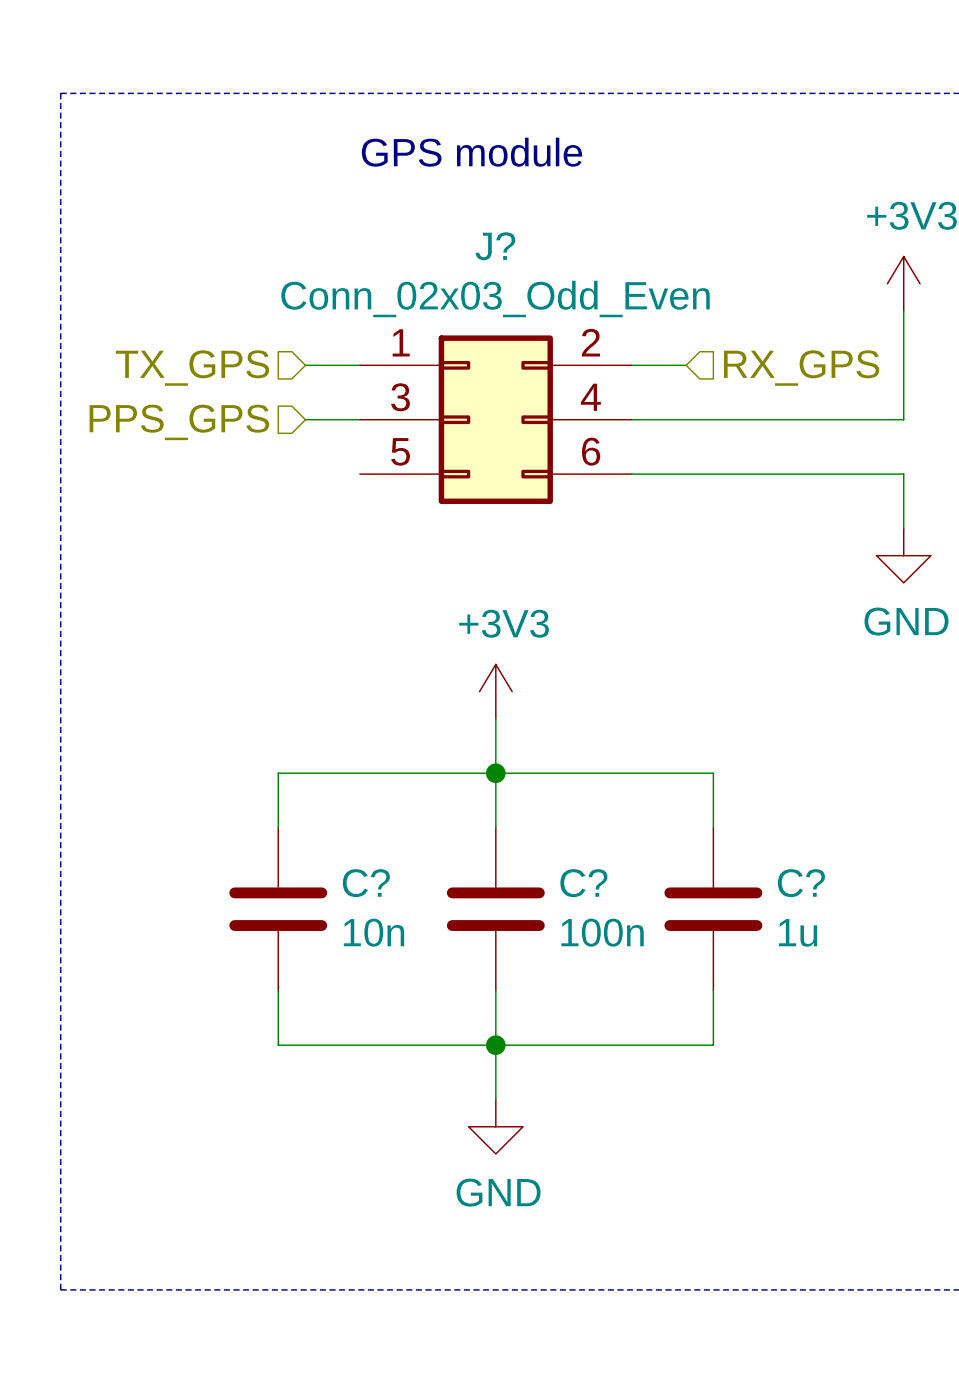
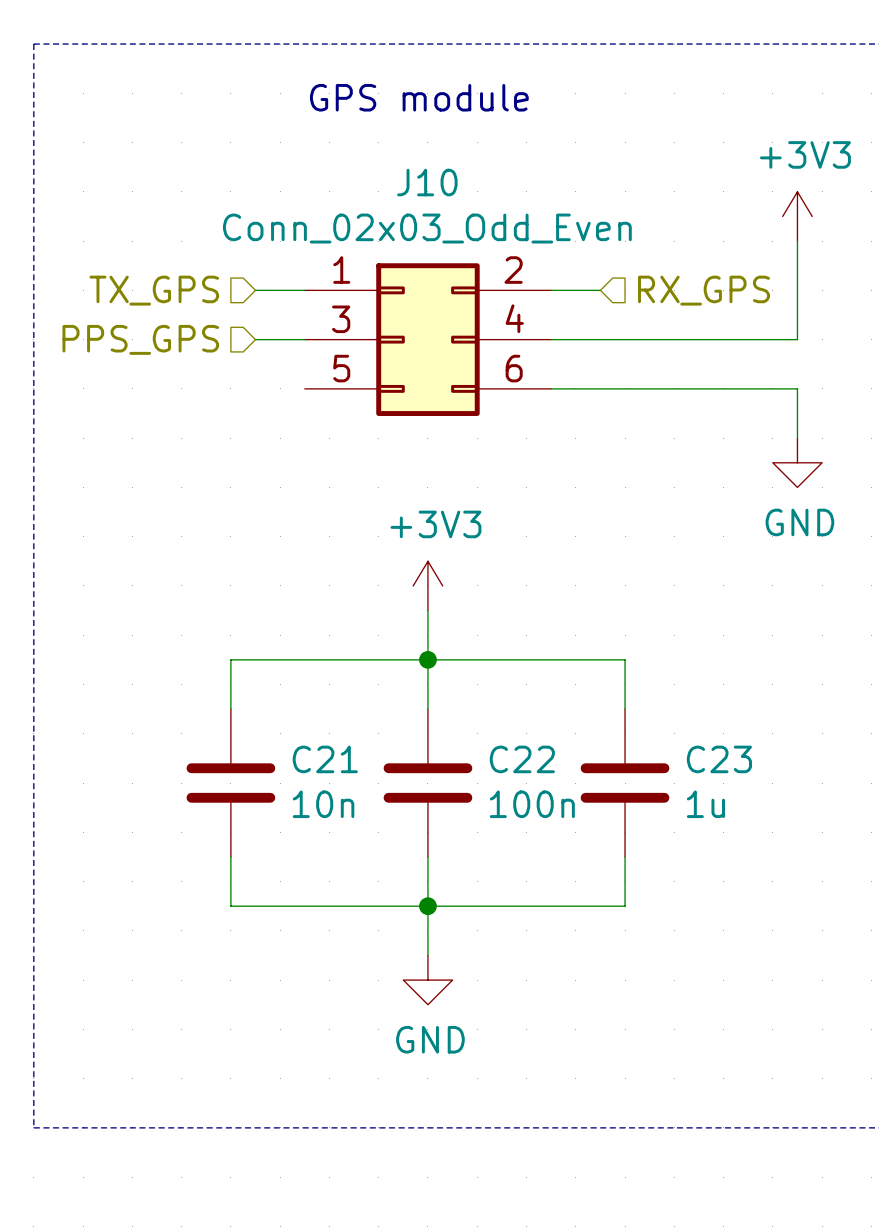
J? name: J? (495, 246) -> J10 (427, 182)
C? name: C? (366, 883) -> C21 (325, 759)
C? name: C? (583, 883) -> C22 (522, 759)
C? name: C? (801, 883) -> C23 (719, 759)

